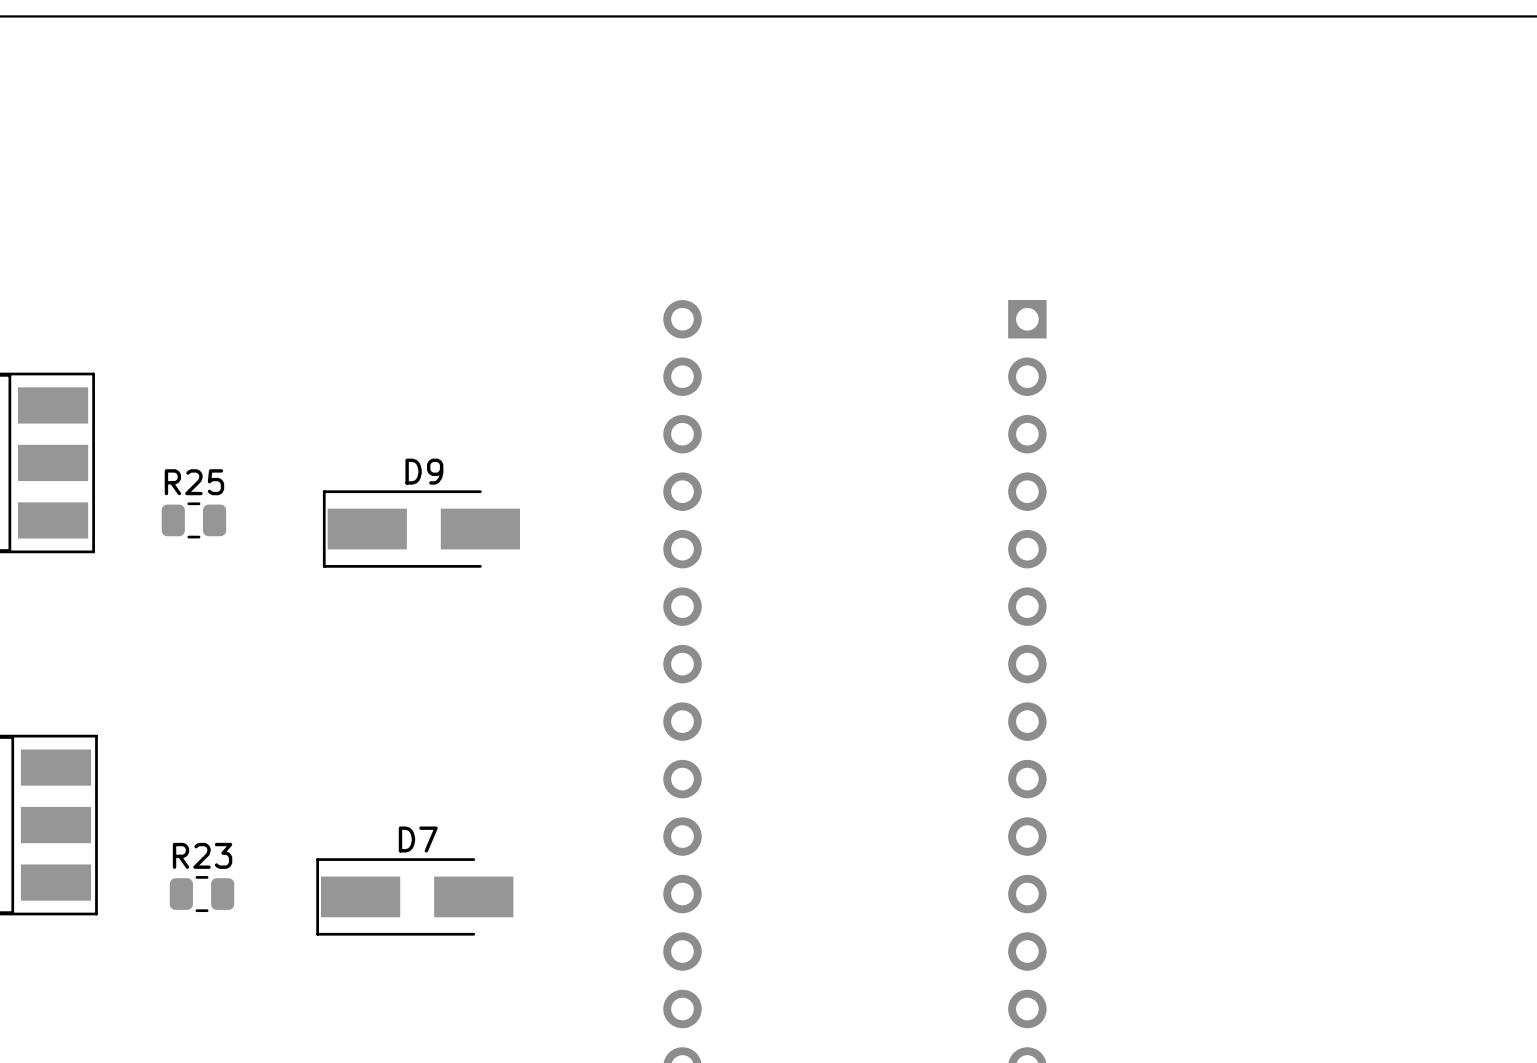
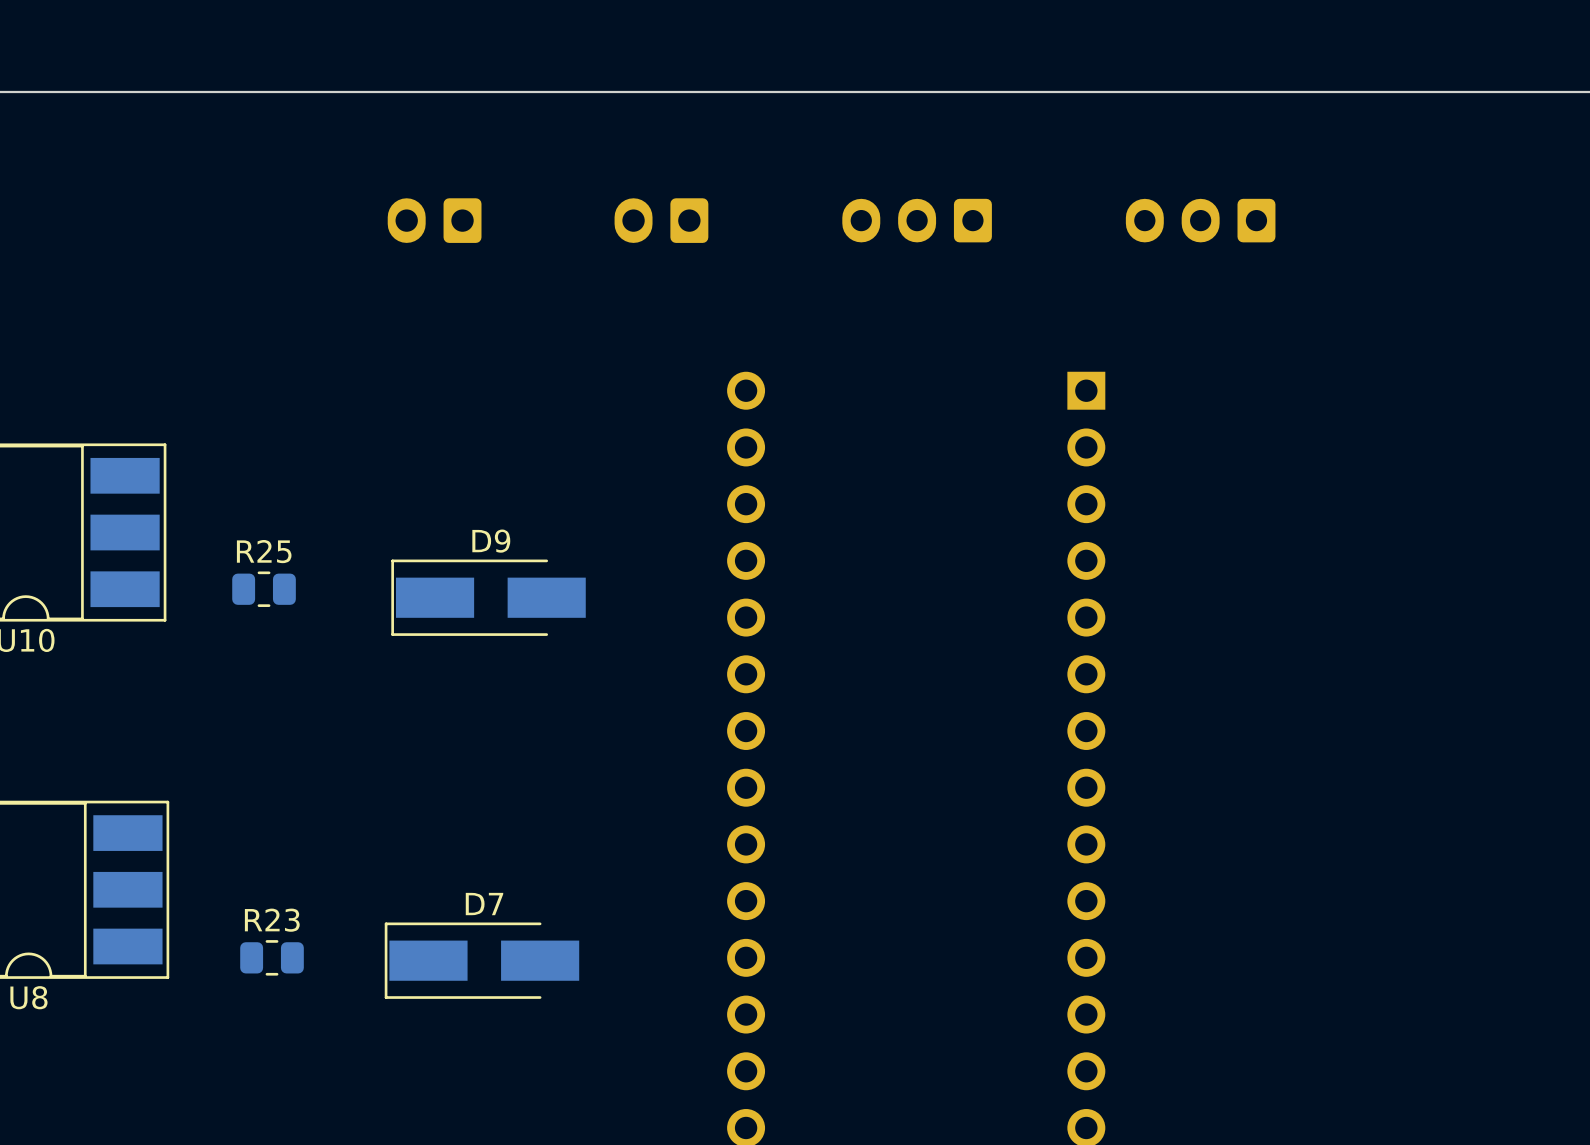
part: none -> (434, 220)
part: none -> (661, 220)
part: none -> (917, 220)
part: none -> (1200, 220)

